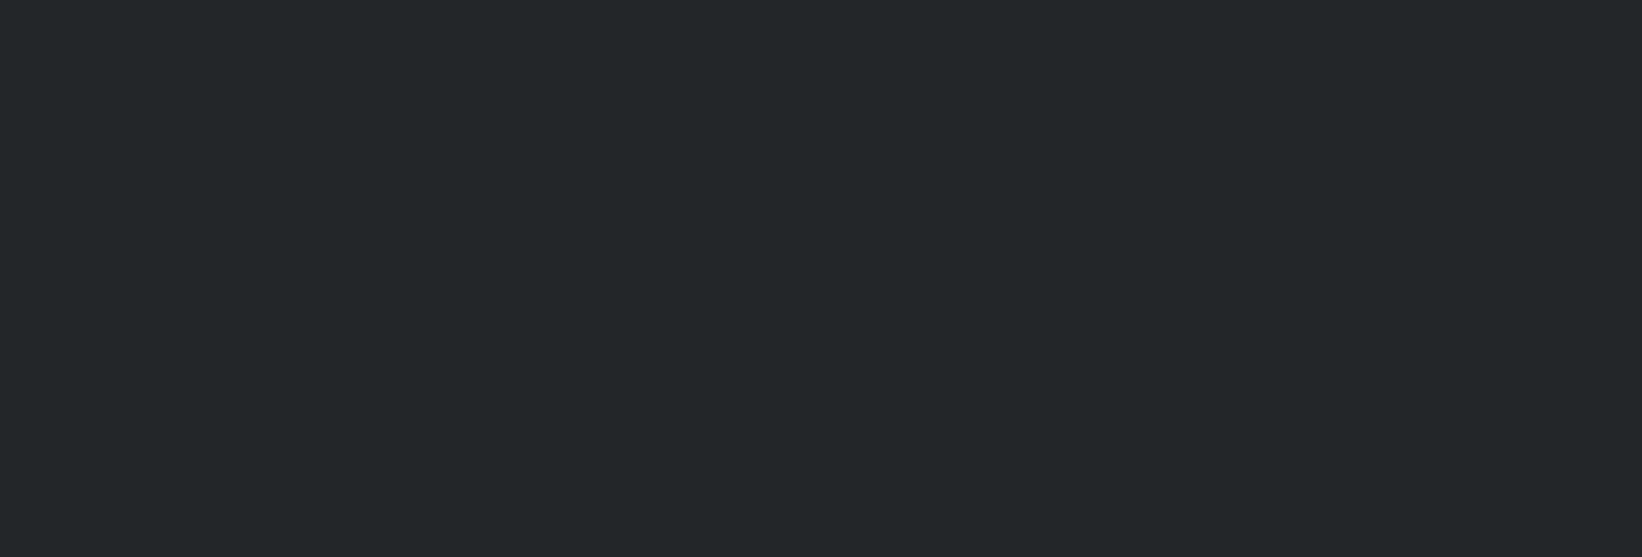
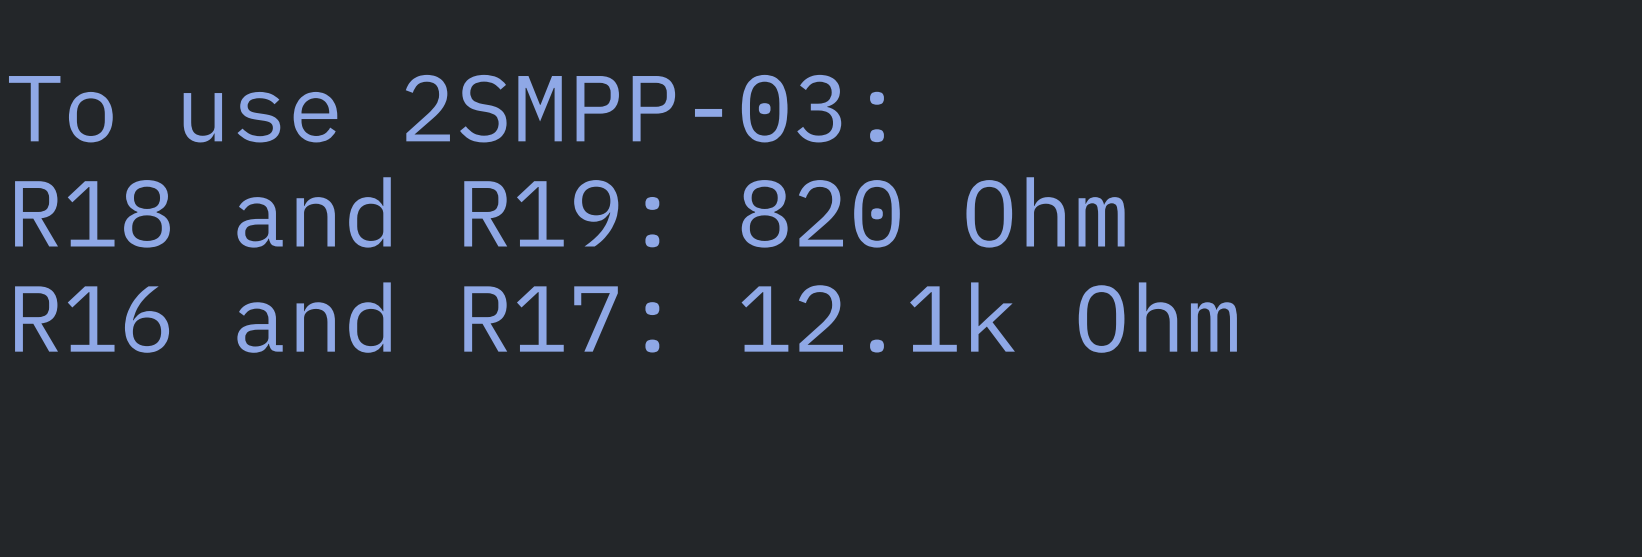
text: none -> To use 2SMPP-03: (446, 108)
text: none -> R18 and R19: 820 Ohm (569, 212)
text: none -> R16 and R17: 12.1k Ohm (625, 317)

